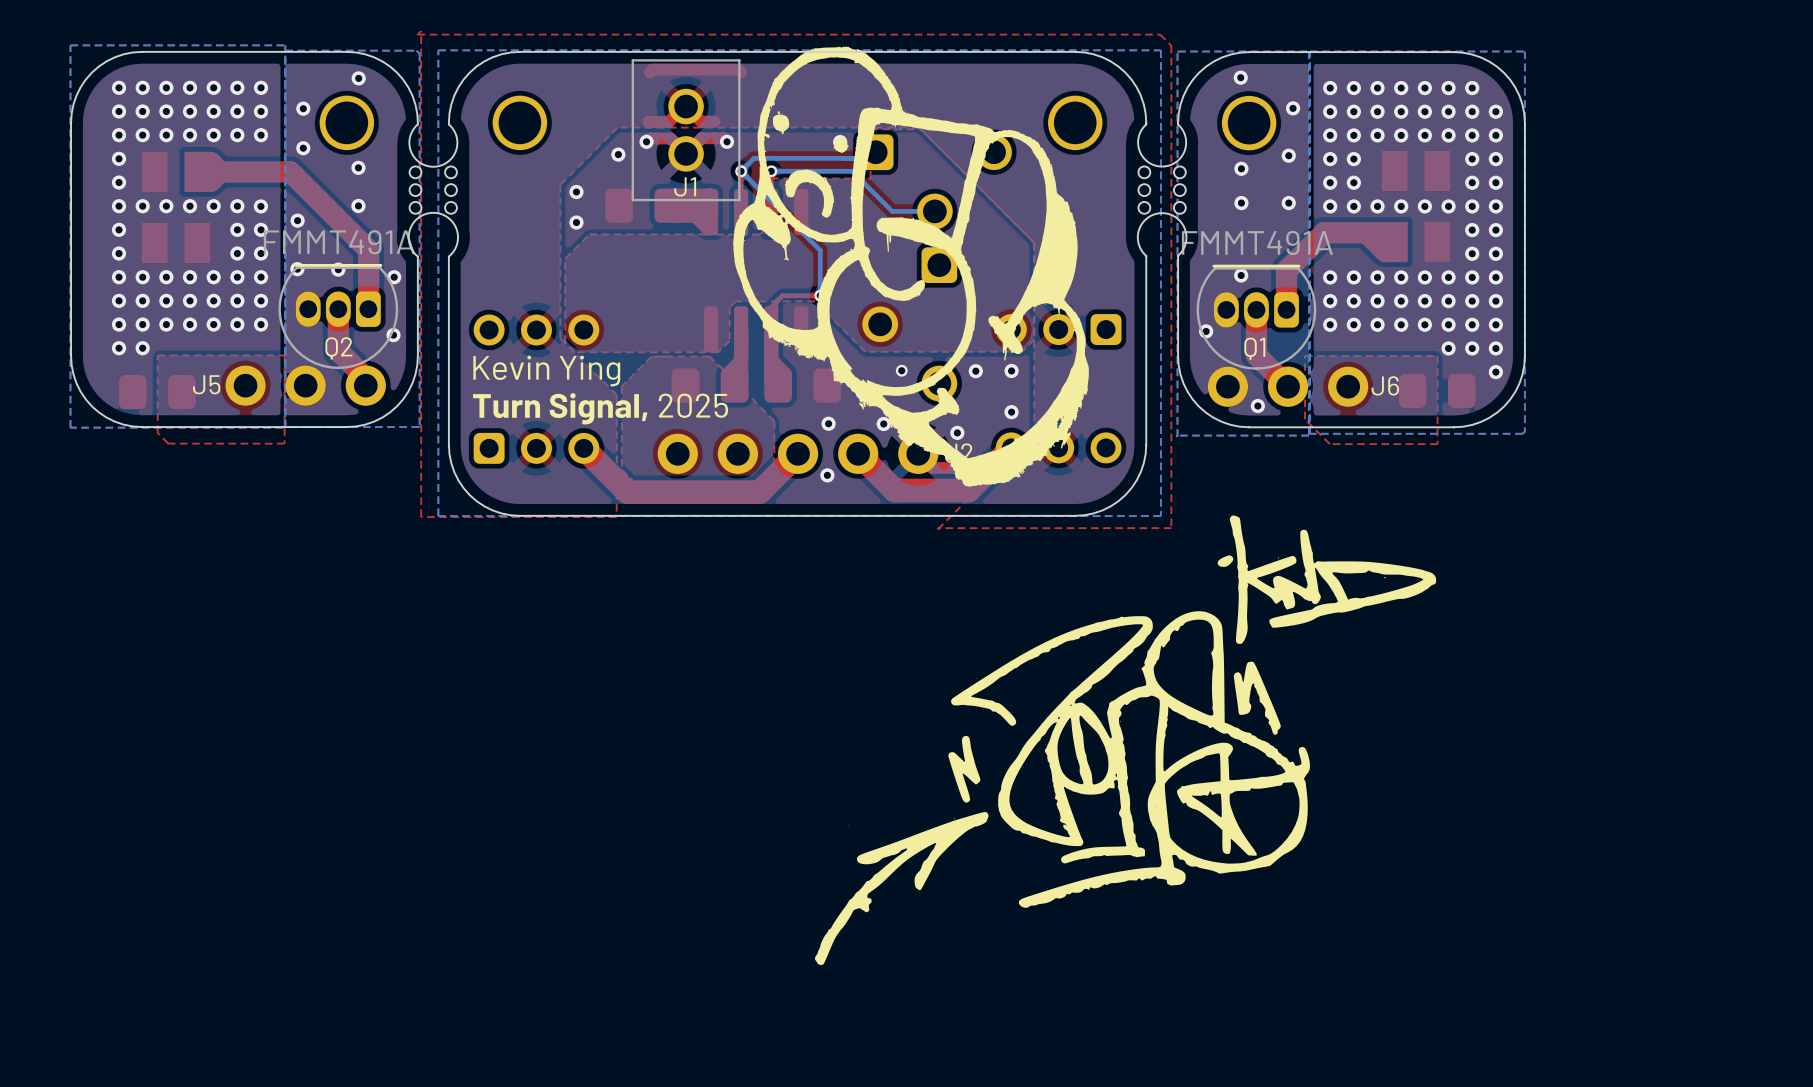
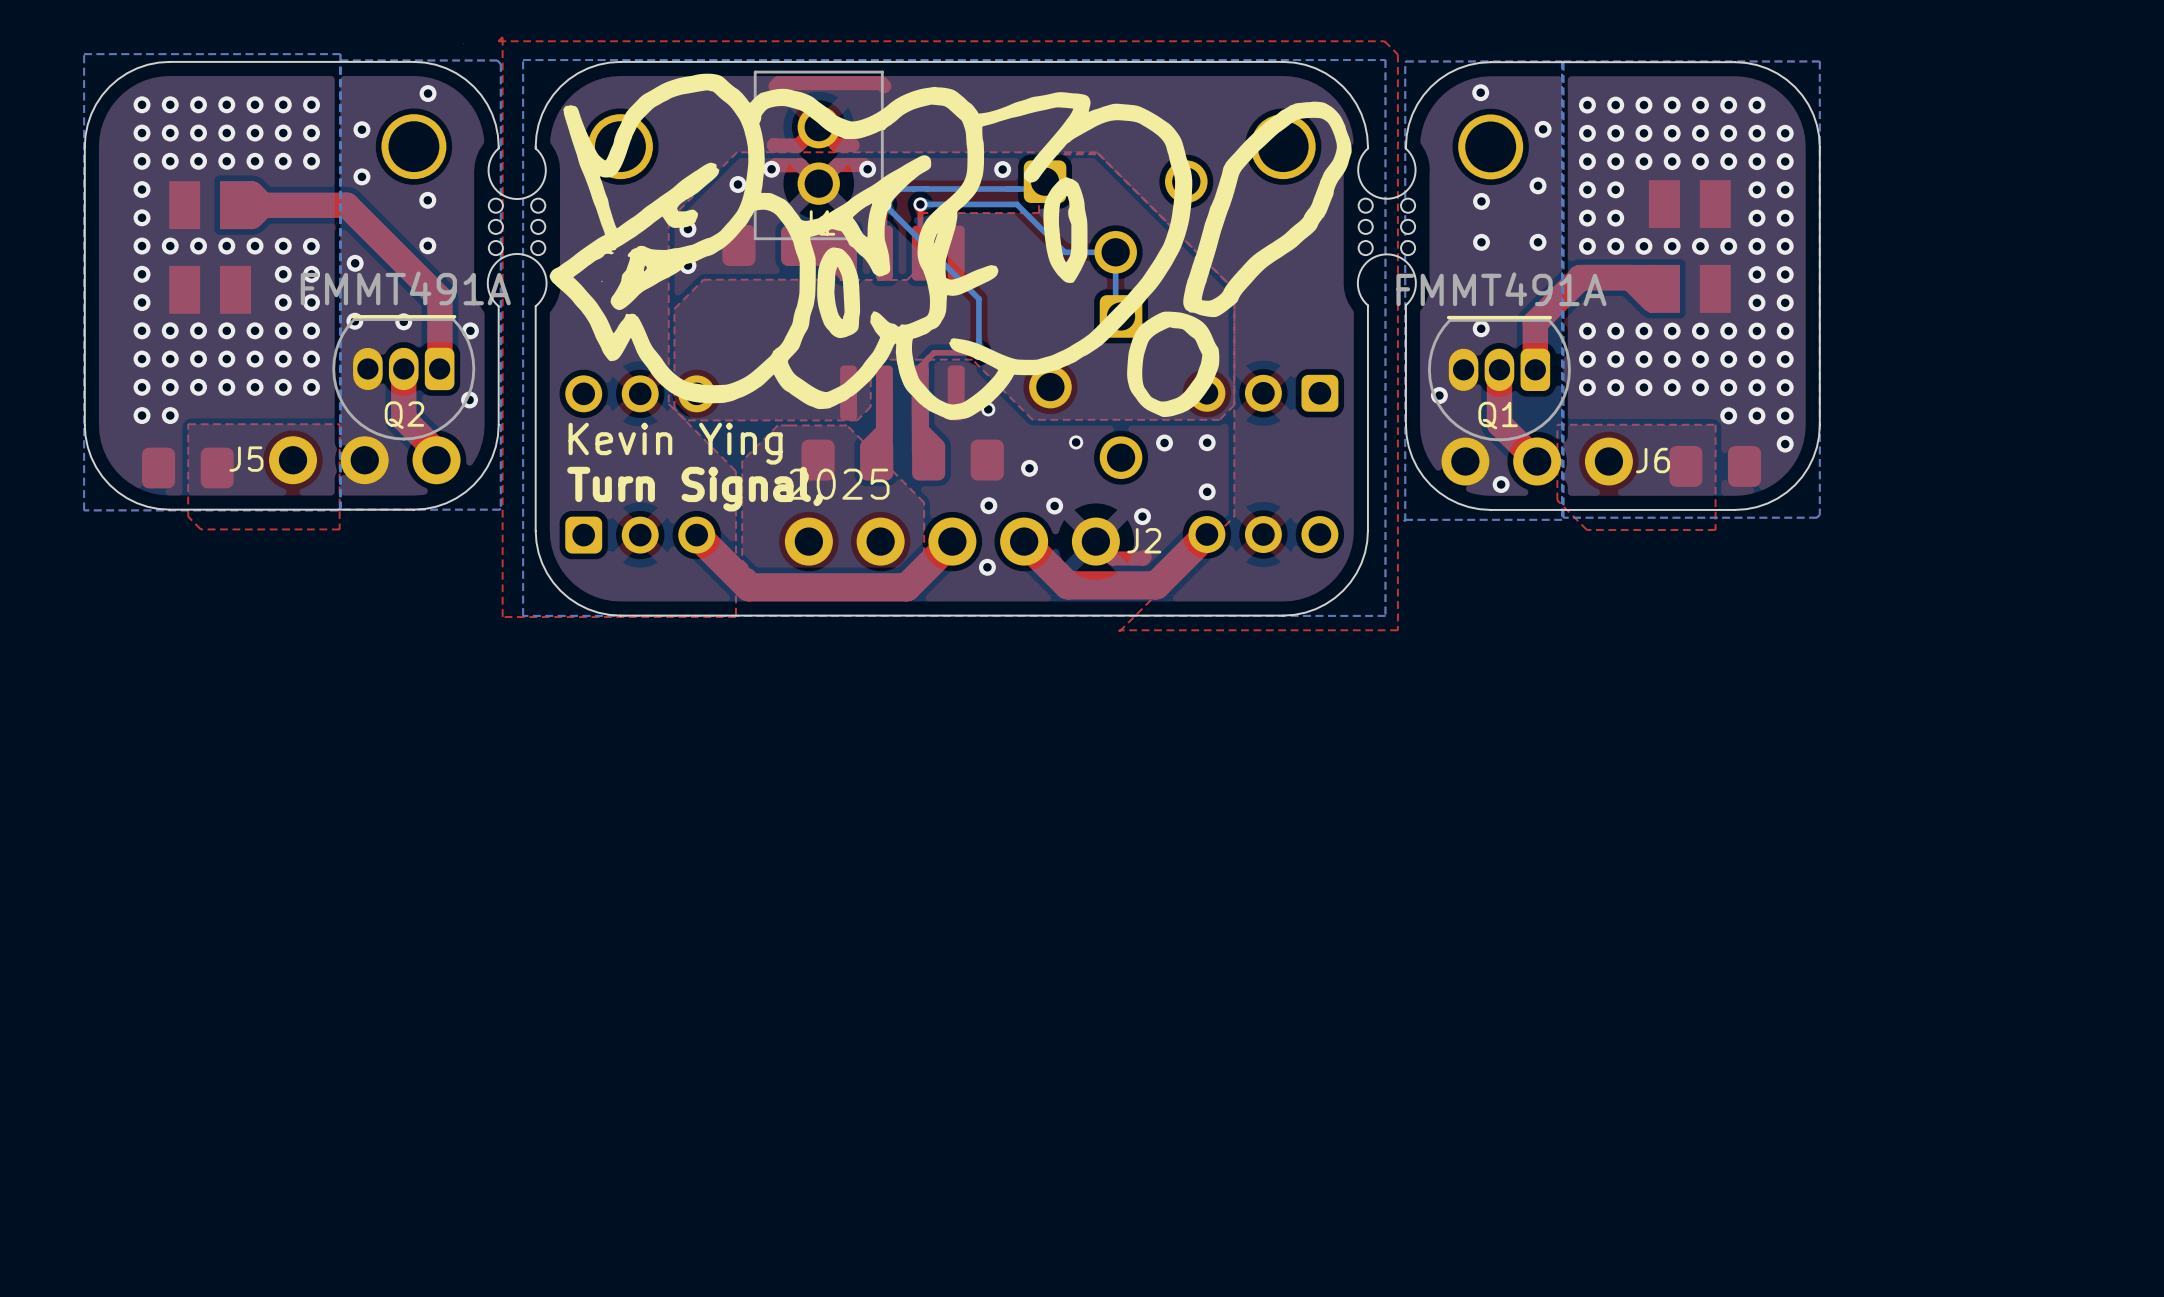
drawing: none -> [463, 42, 1352, 420]
drawing: [733, 46, 1089, 487] -> none
drawing: [814, 515, 1437, 966] -> none

